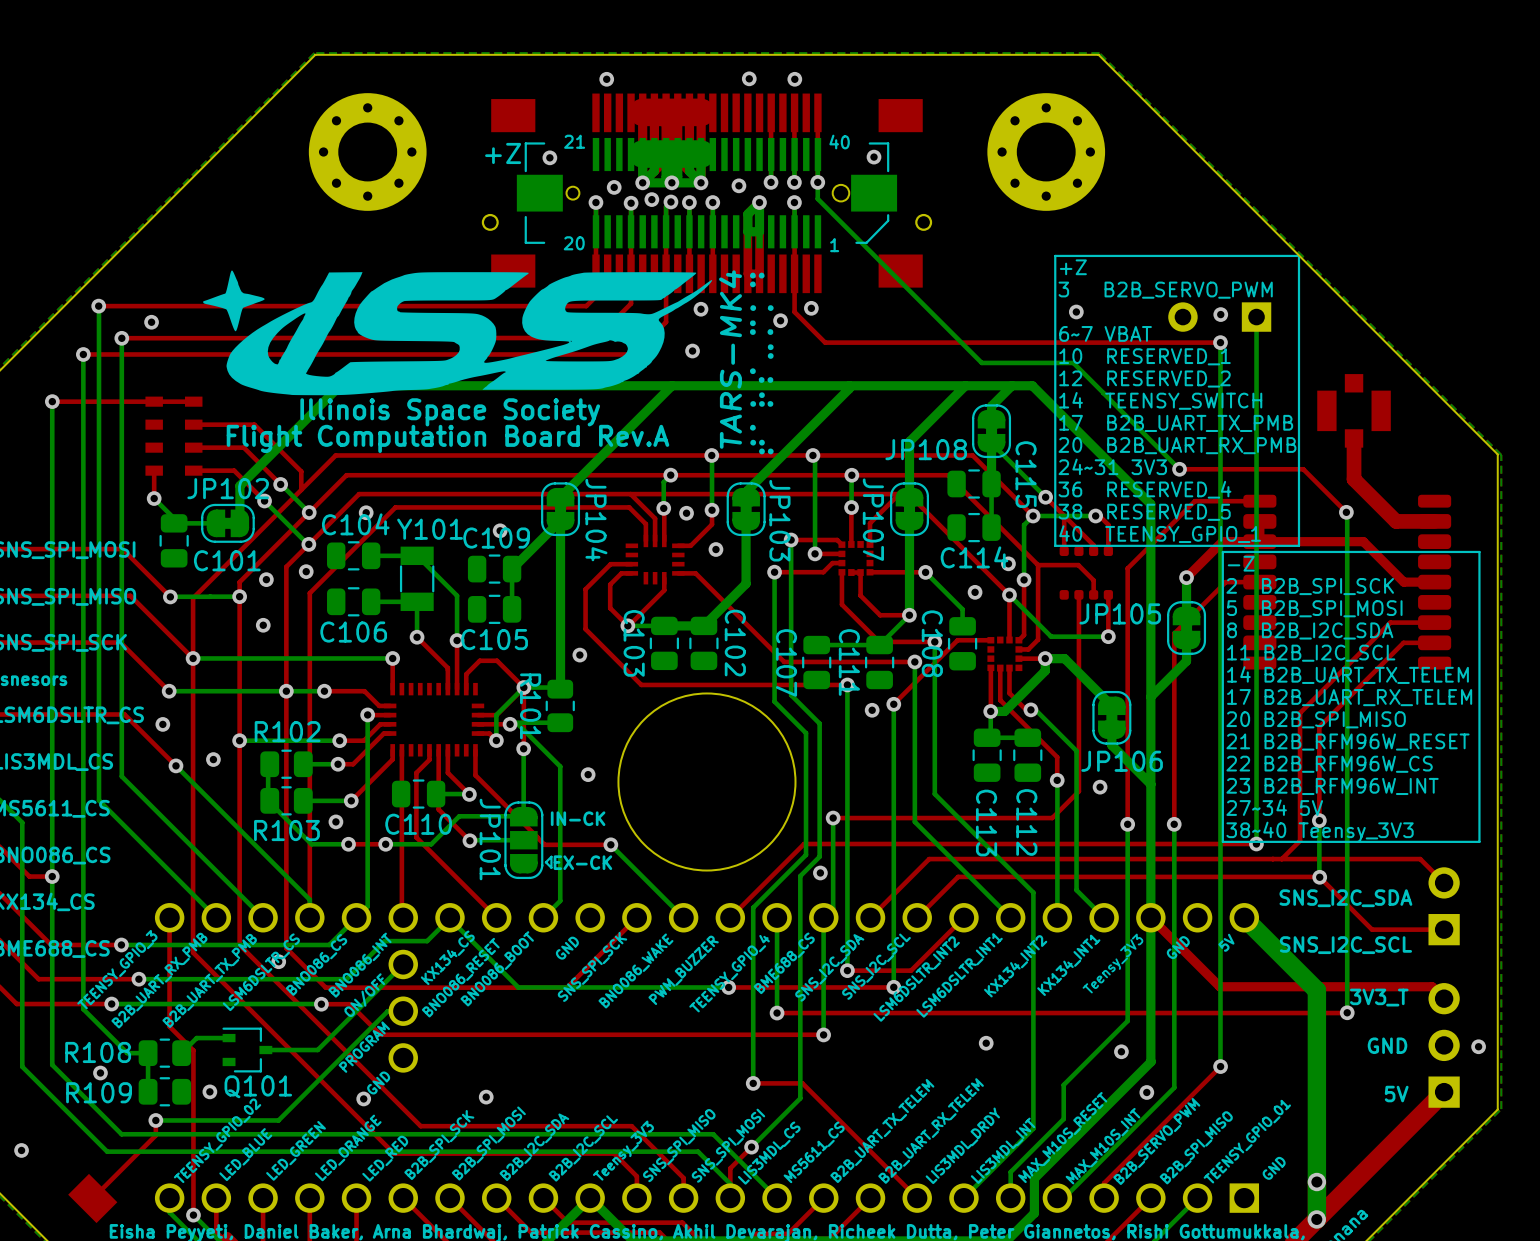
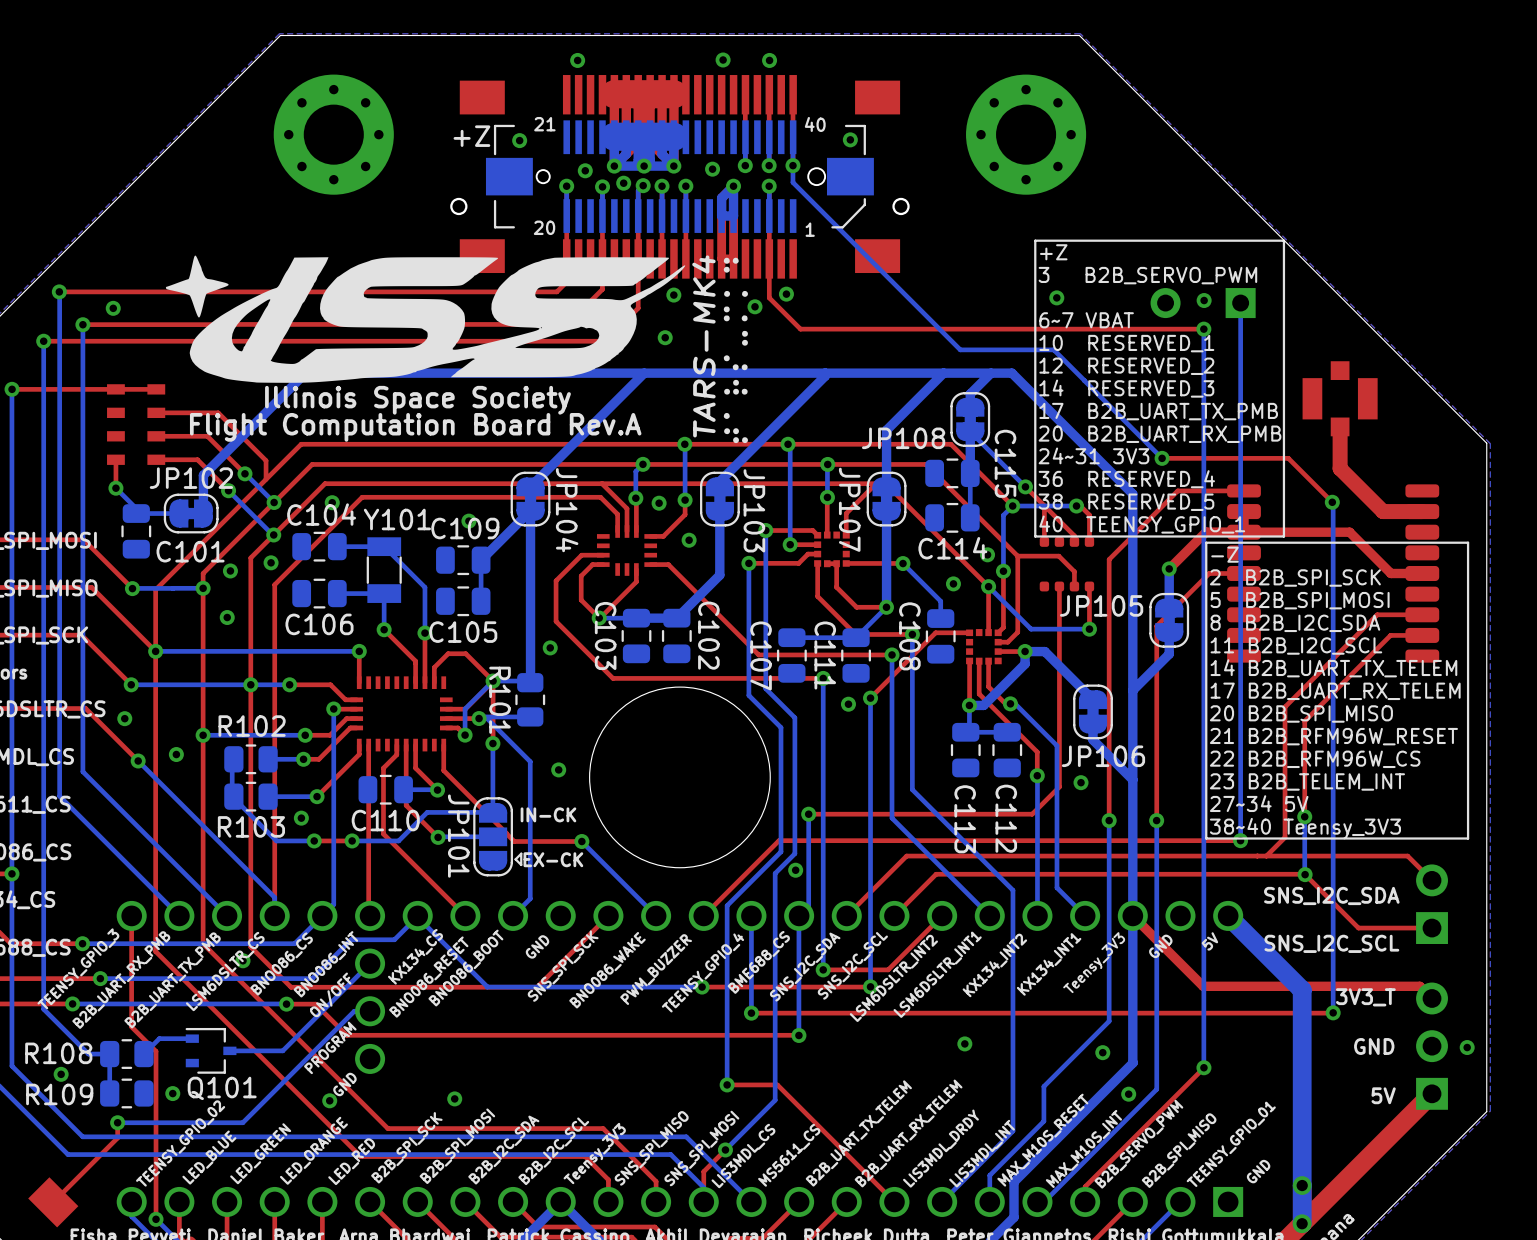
text: 14 TEENSY_SWITCH (1160, 400) -> 14 RESERVED_3 (1126, 388)
text: 23 B2B_RFM96W_INT (1332, 786) -> 23 B2B_TELEM_INT (1307, 781)

